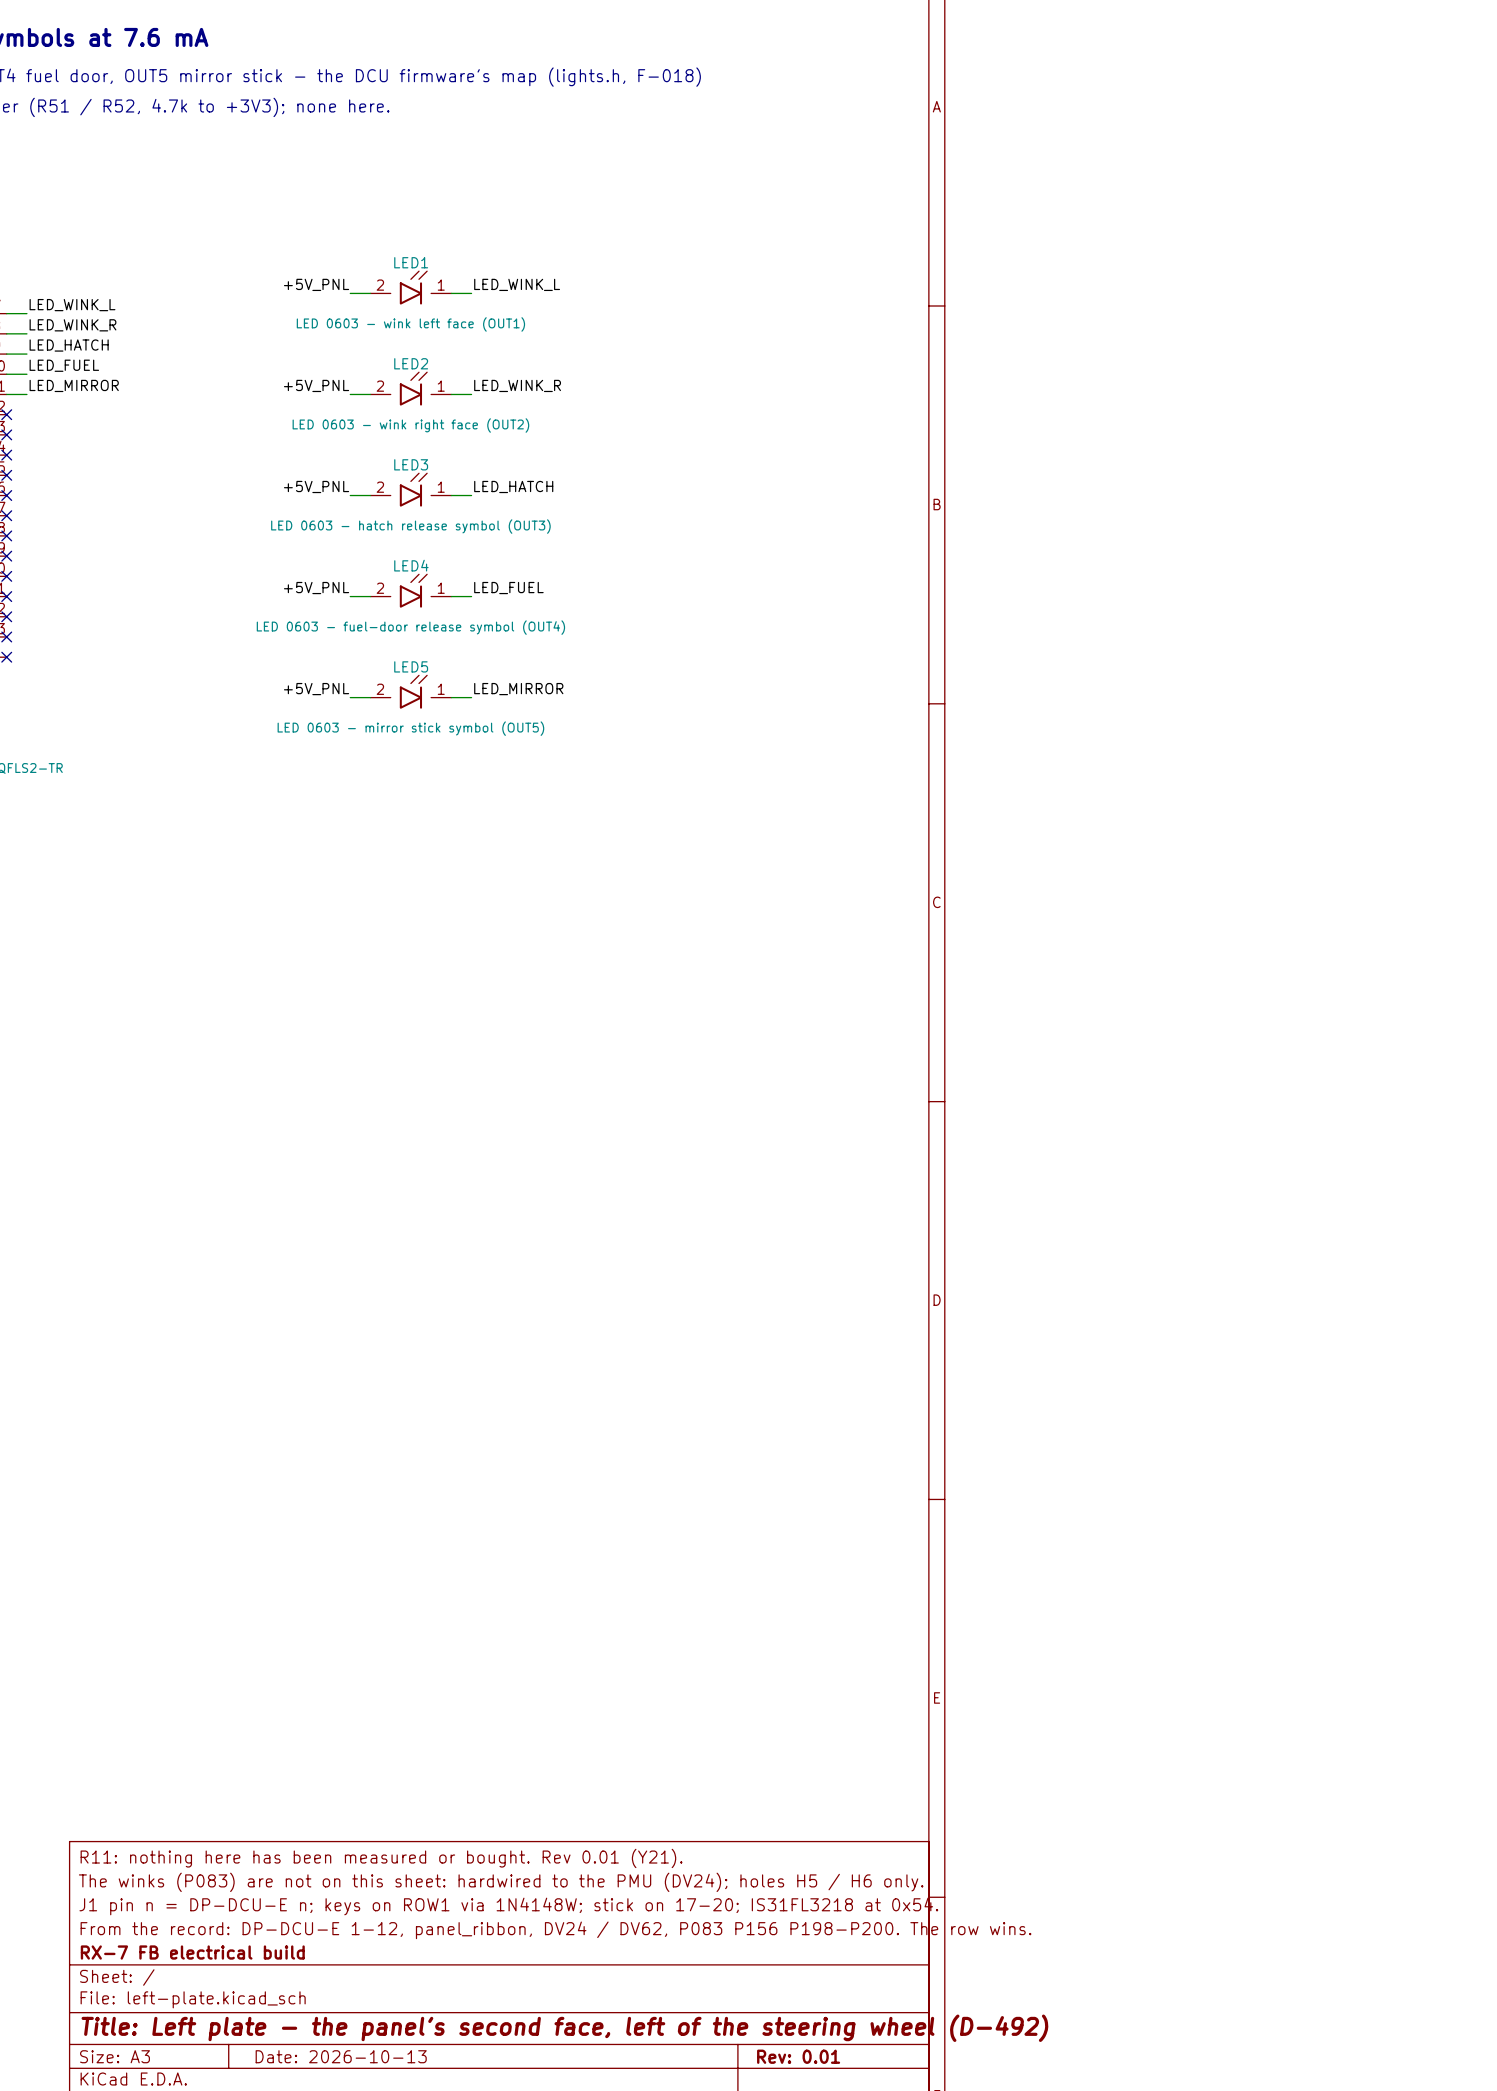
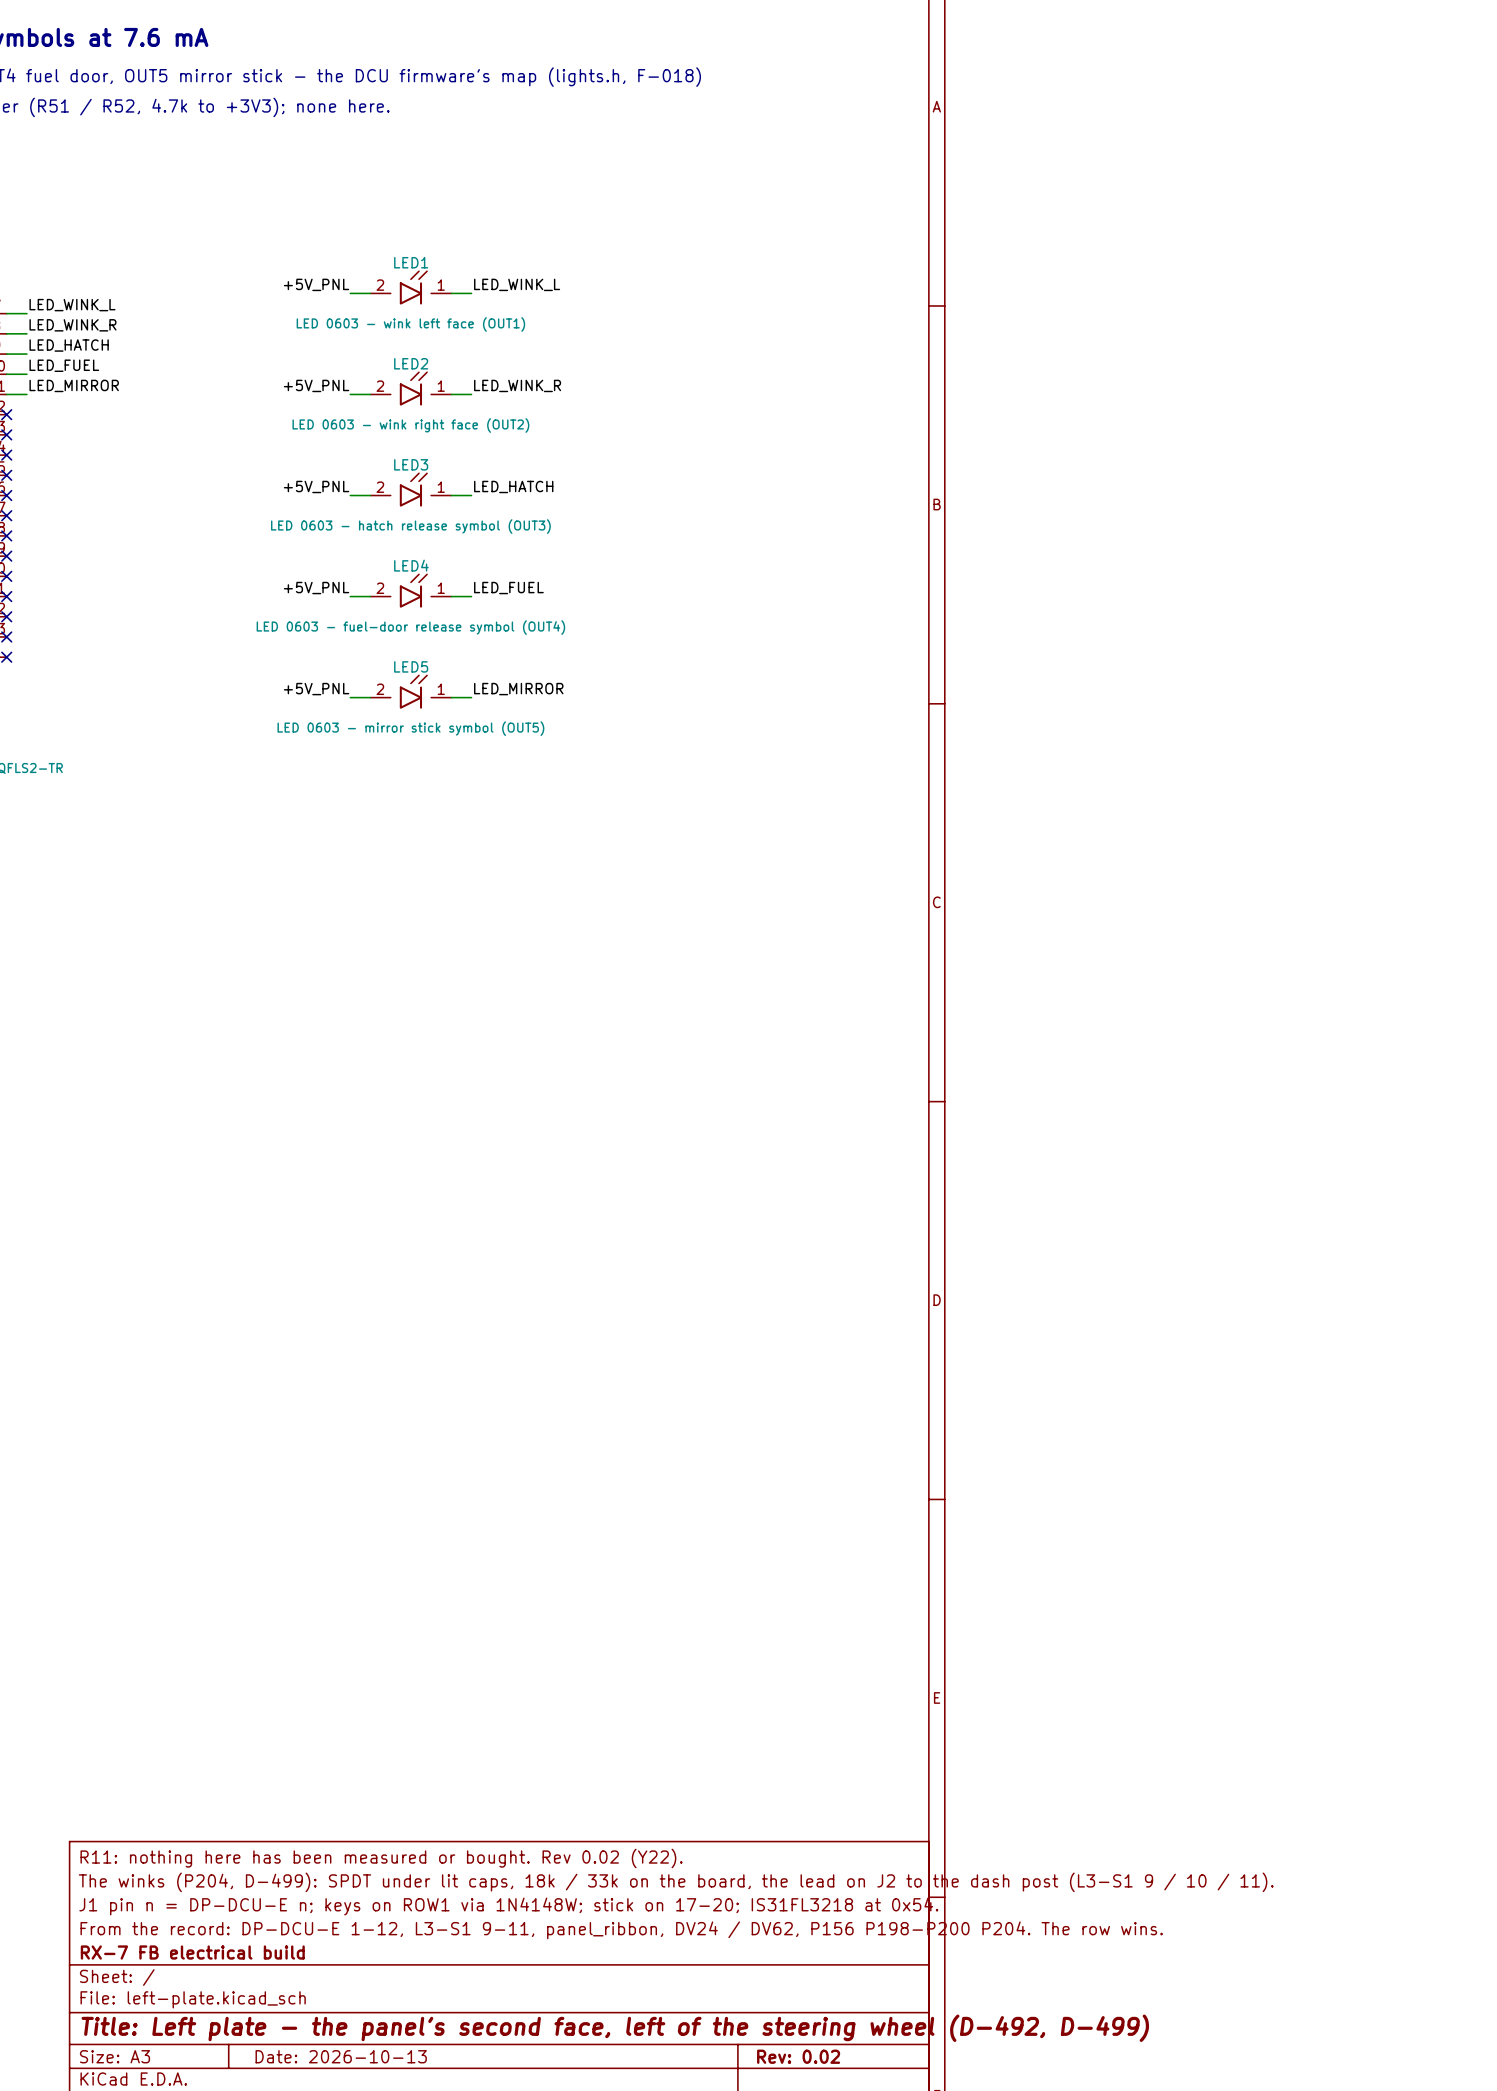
title block: R11: nothing here has been measured or bought. Rev 0.01 (Y21). (381, 1858) -> R11: nothing here has been measured or bought. Rev 0.02 (Y22). (381, 1858)
title block: The winks (P083) are not on this sheet: hardwired to the PMU (DV24); holes H5 / H6 only. (501, 1882) -> The winks (P204, D-499): SPDT under lit caps, 18k / 33k on the board, the lead on J2 to the dash post (L3-S1 9 / 10 / 11). (676, 1882)
title block: From the record: DP-DCU-E 1-12, panel_ribbon, DV24 / DV62, P083 P156 P198-P200. The row wins. (556, 1930) -> From the record: DP-DCU-E 1-12, L3-S1 9-11, panel_ribbon, DV24 / DV62, P156 P198-P200 P204. The row wins. (621, 1930)
title block: Title: Left plate - the panel's second face, left of the steering wheel (D-492) (564, 2028) -> Title: Left plate - the panel's second face, left of the steering wheel (D-492, D-499) (615, 2028)
title block: Rev: 0.01 (798, 2056) -> Rev: 0.02 (798, 2056)

